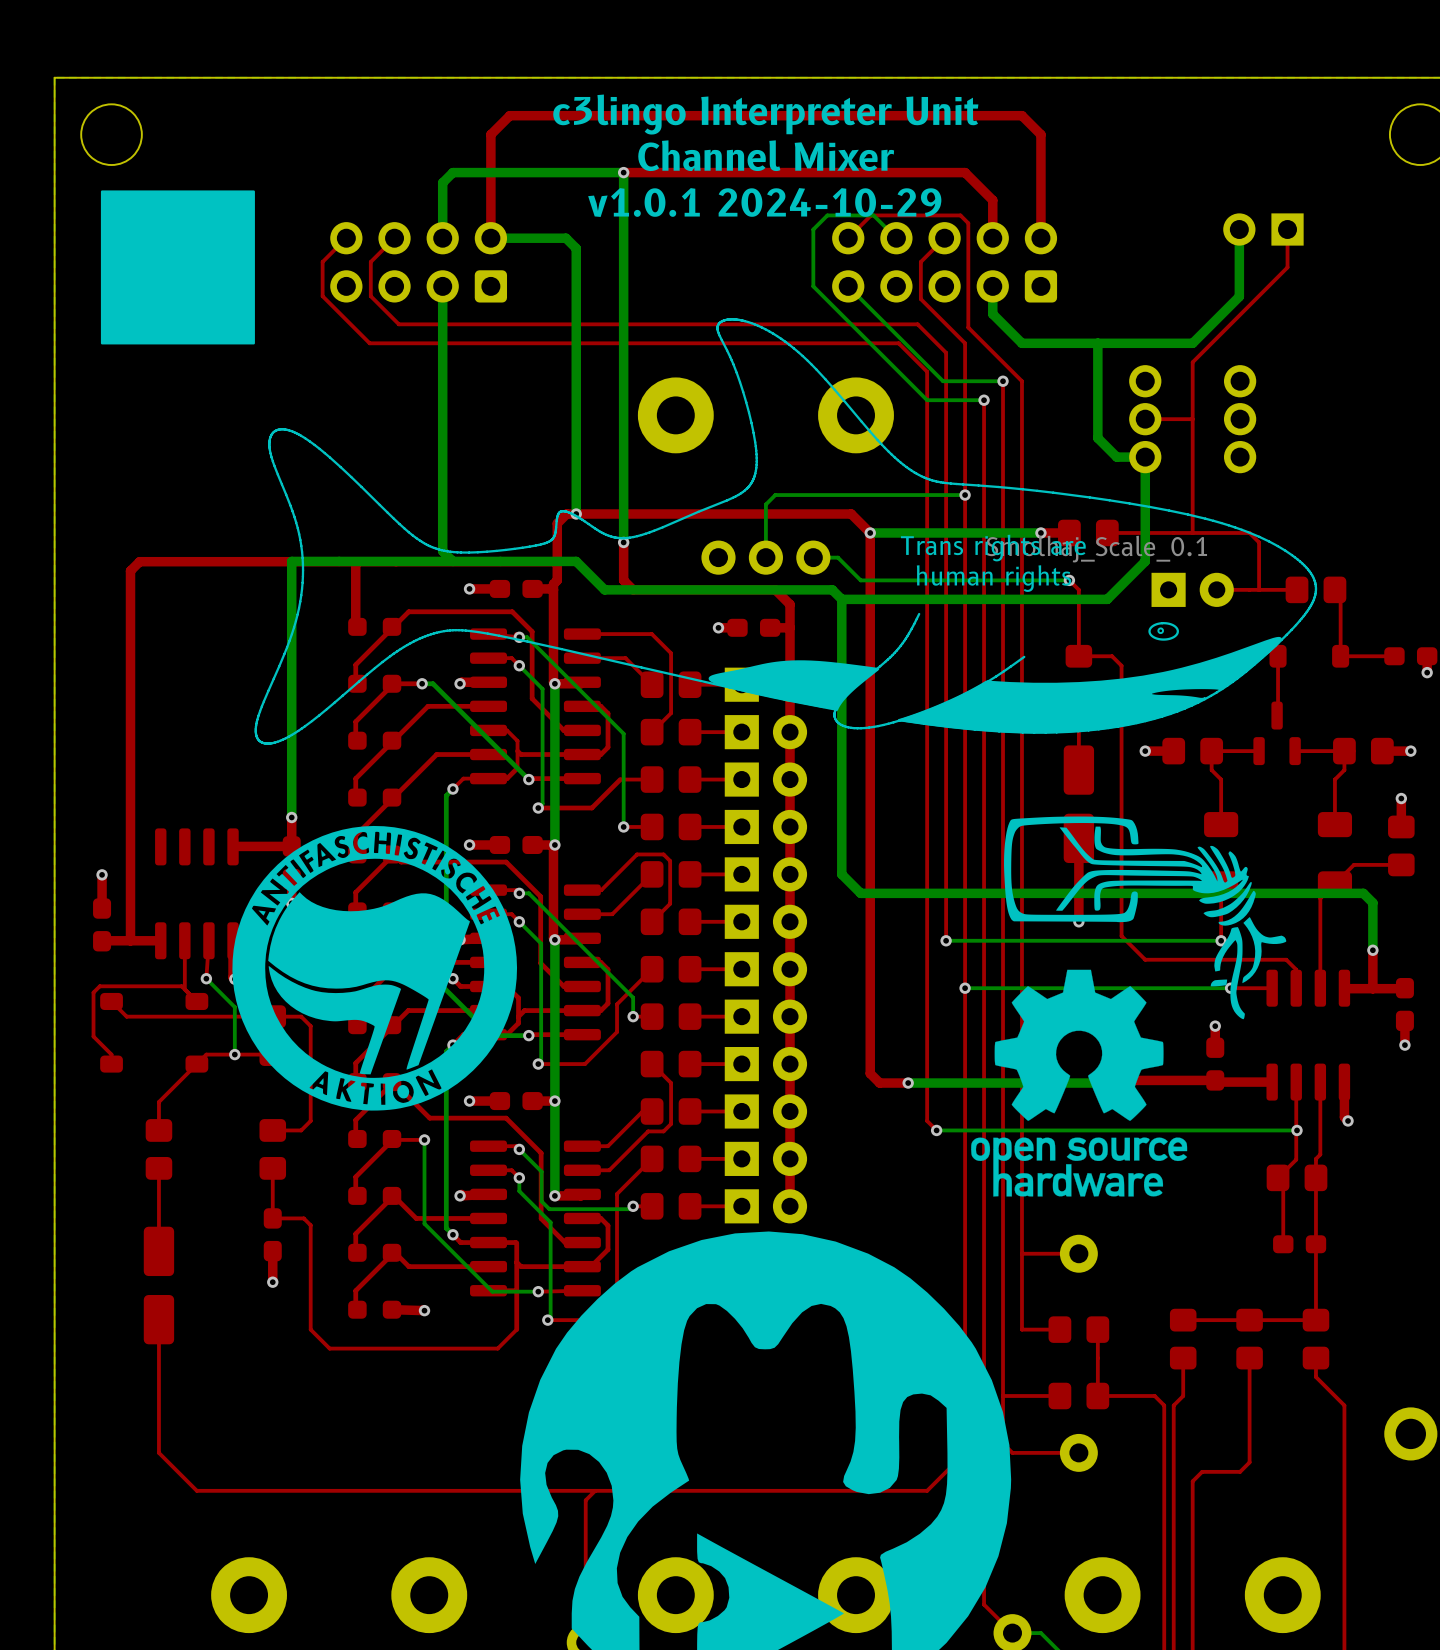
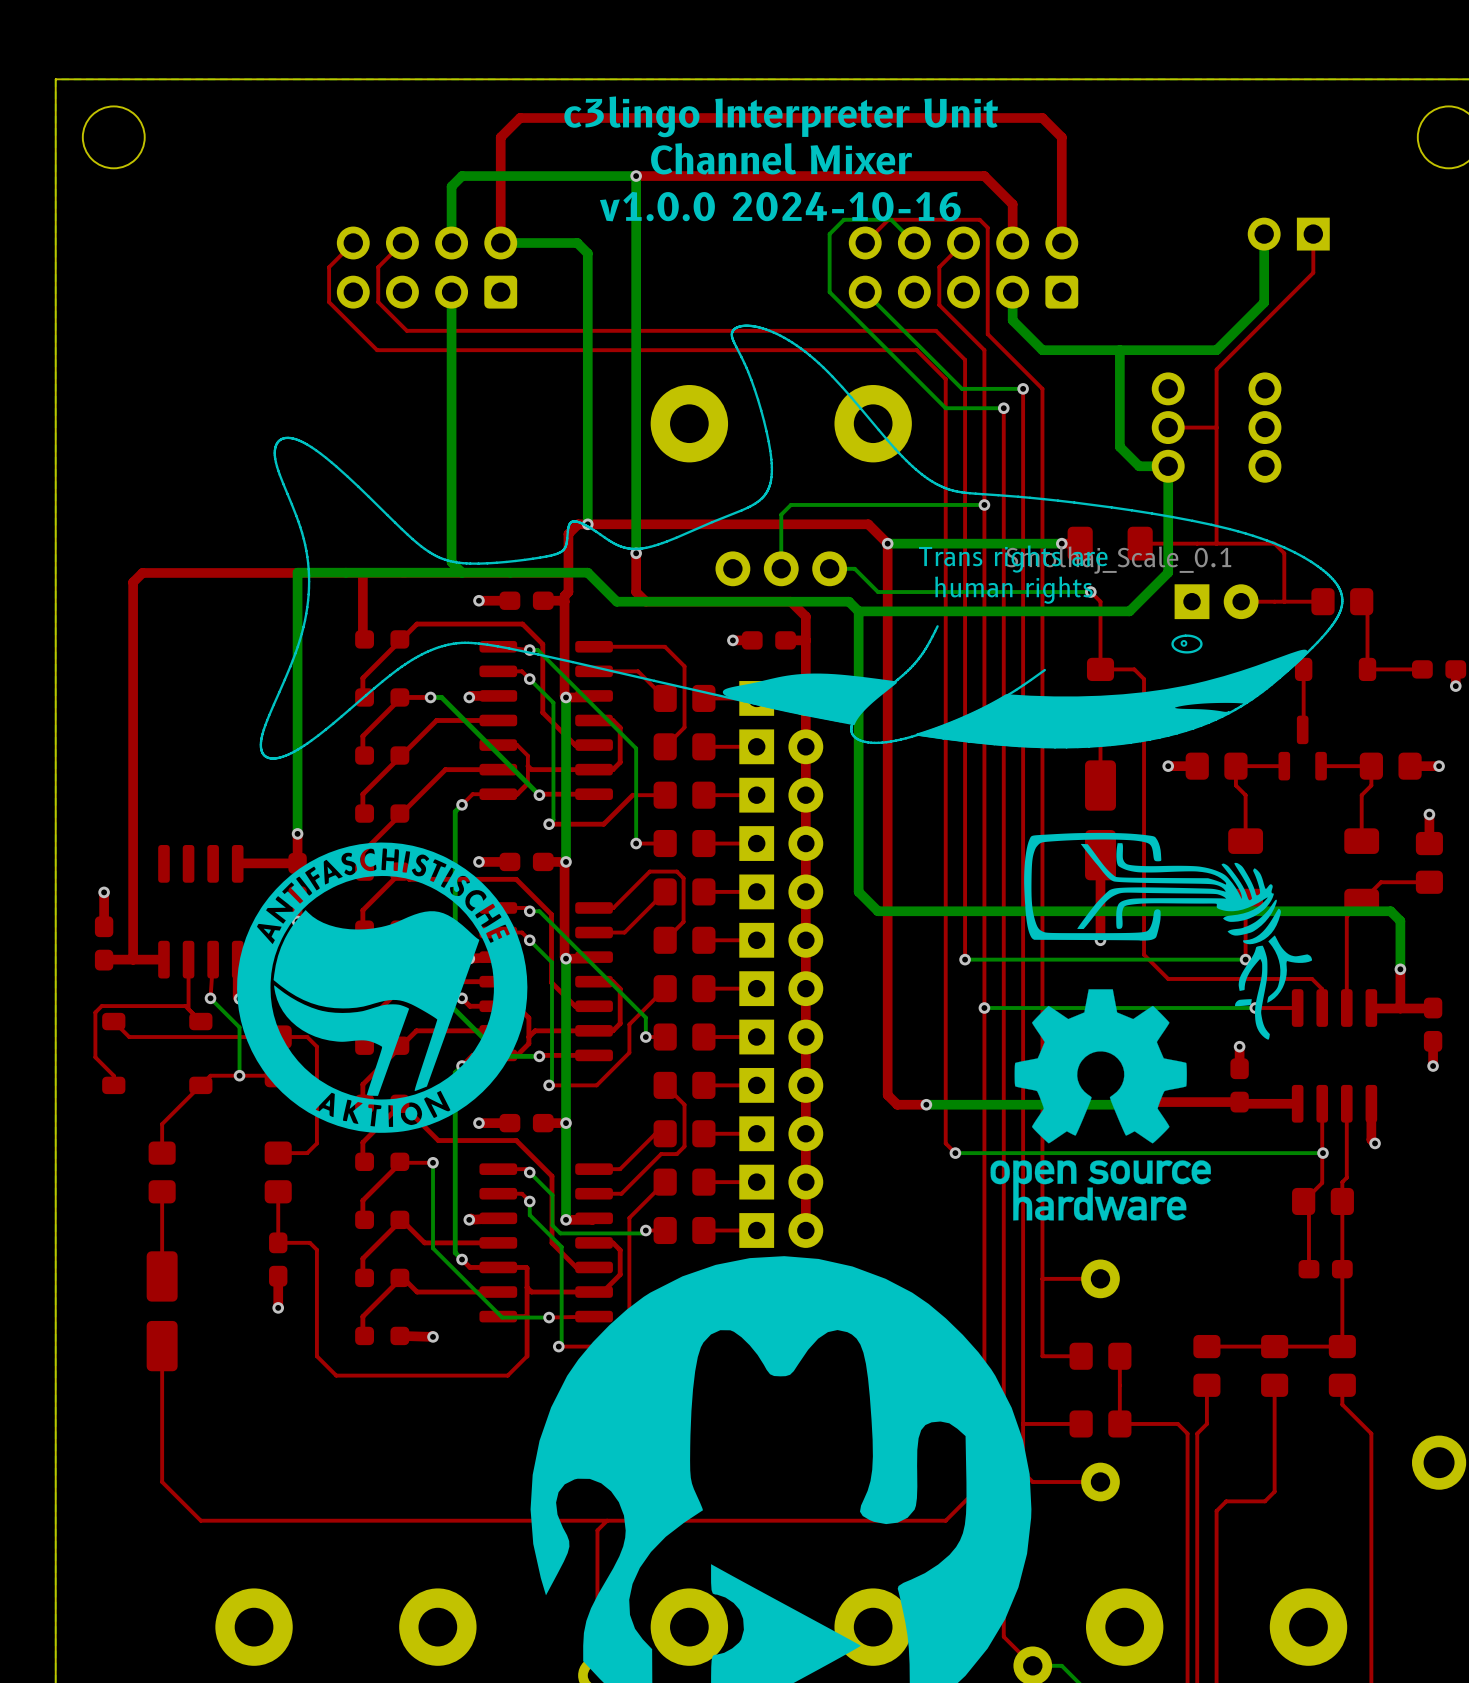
drawing: [100, 190, 255, 345] -> none
text: v1.0.1 2024-10-29 (764, 202) -> v1.0.0 2024-10-16 (780, 206)
part footprint: [1058, 519, 1119, 547] -> [1067, 526, 1153, 561]

